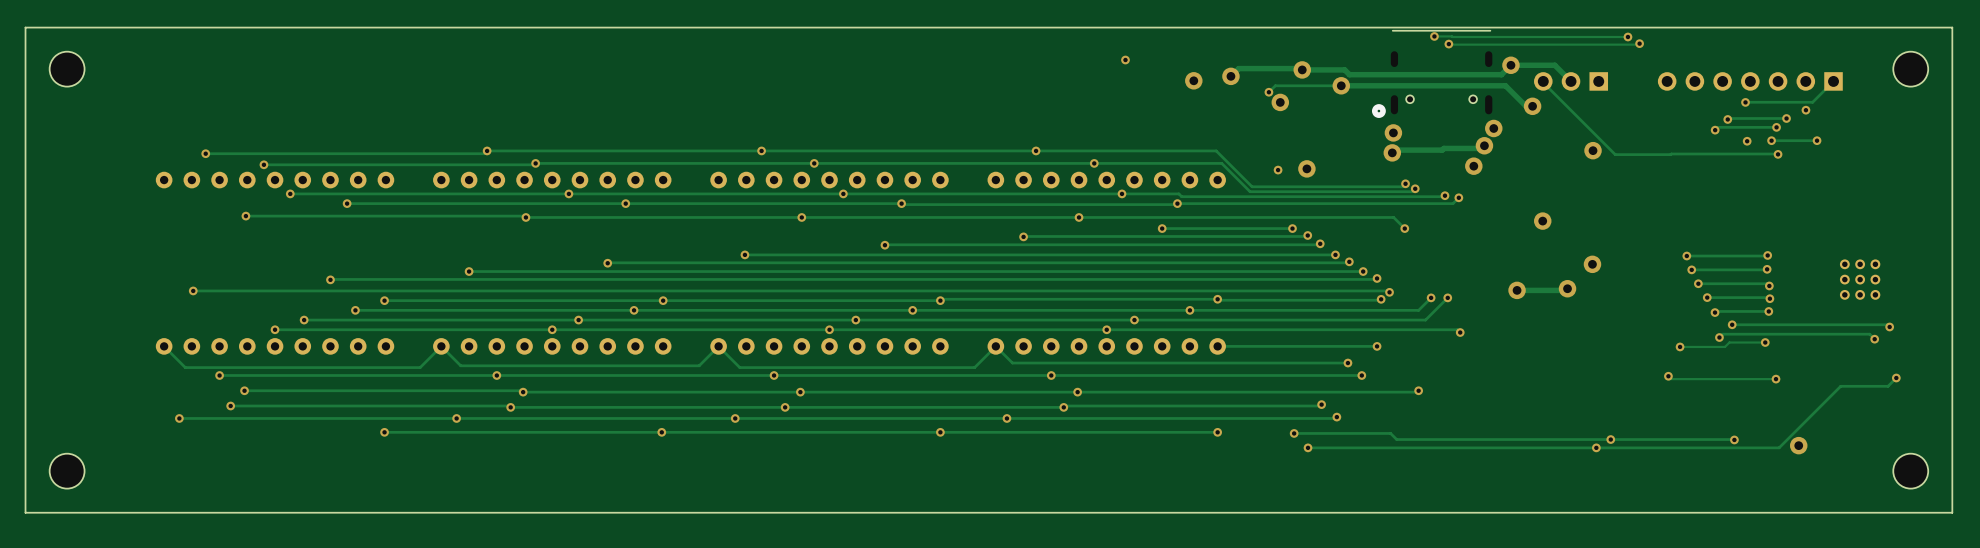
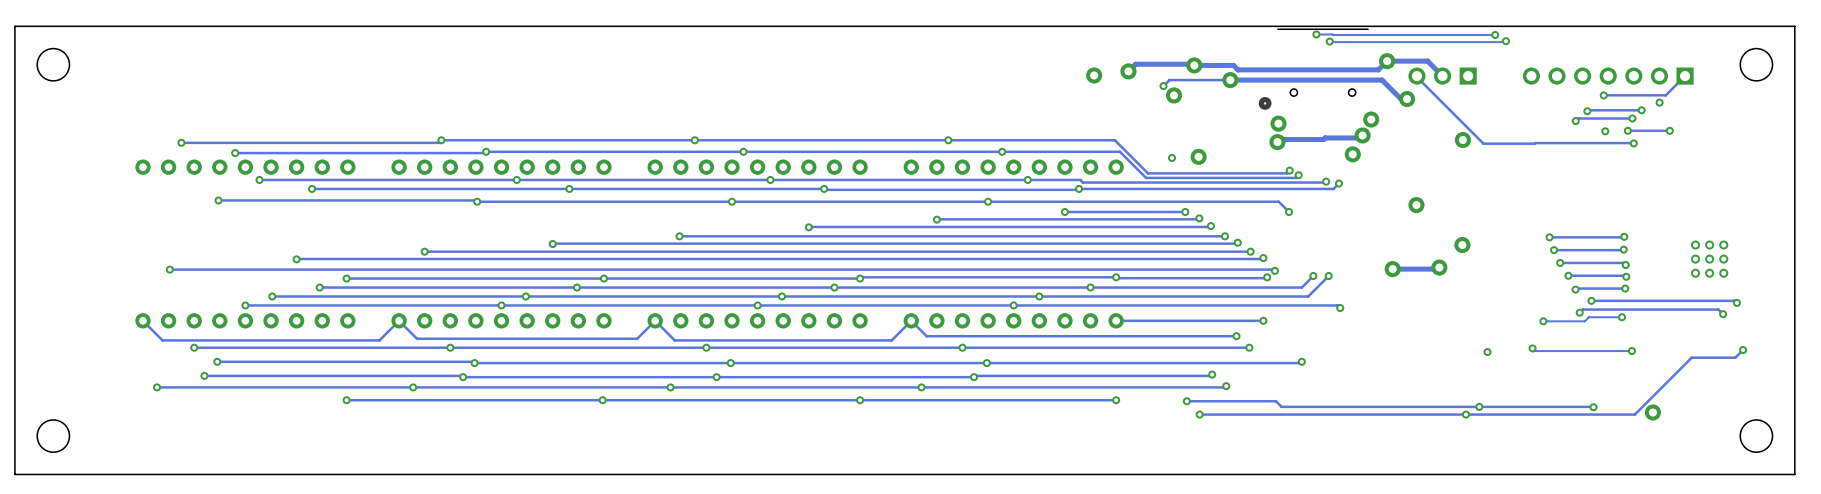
via: (1125, 60) -> none
via: none -> (1487, 352)

